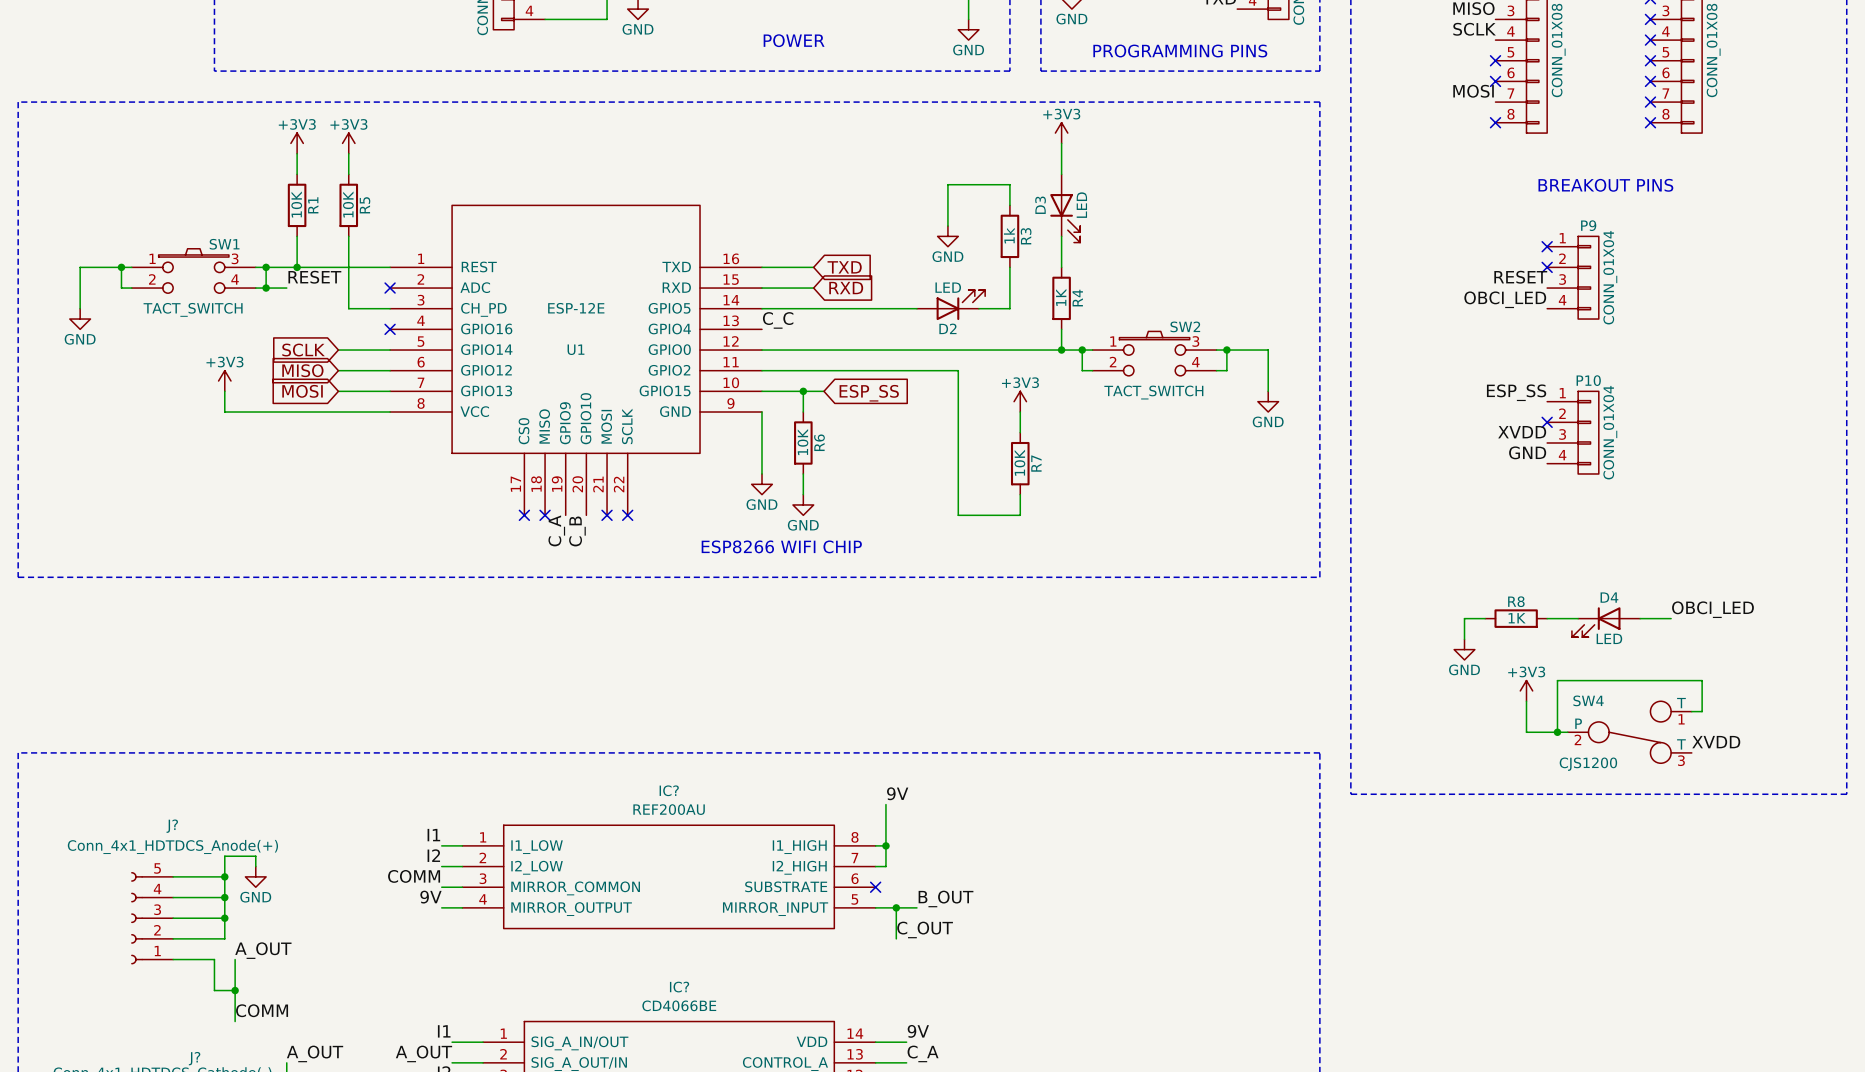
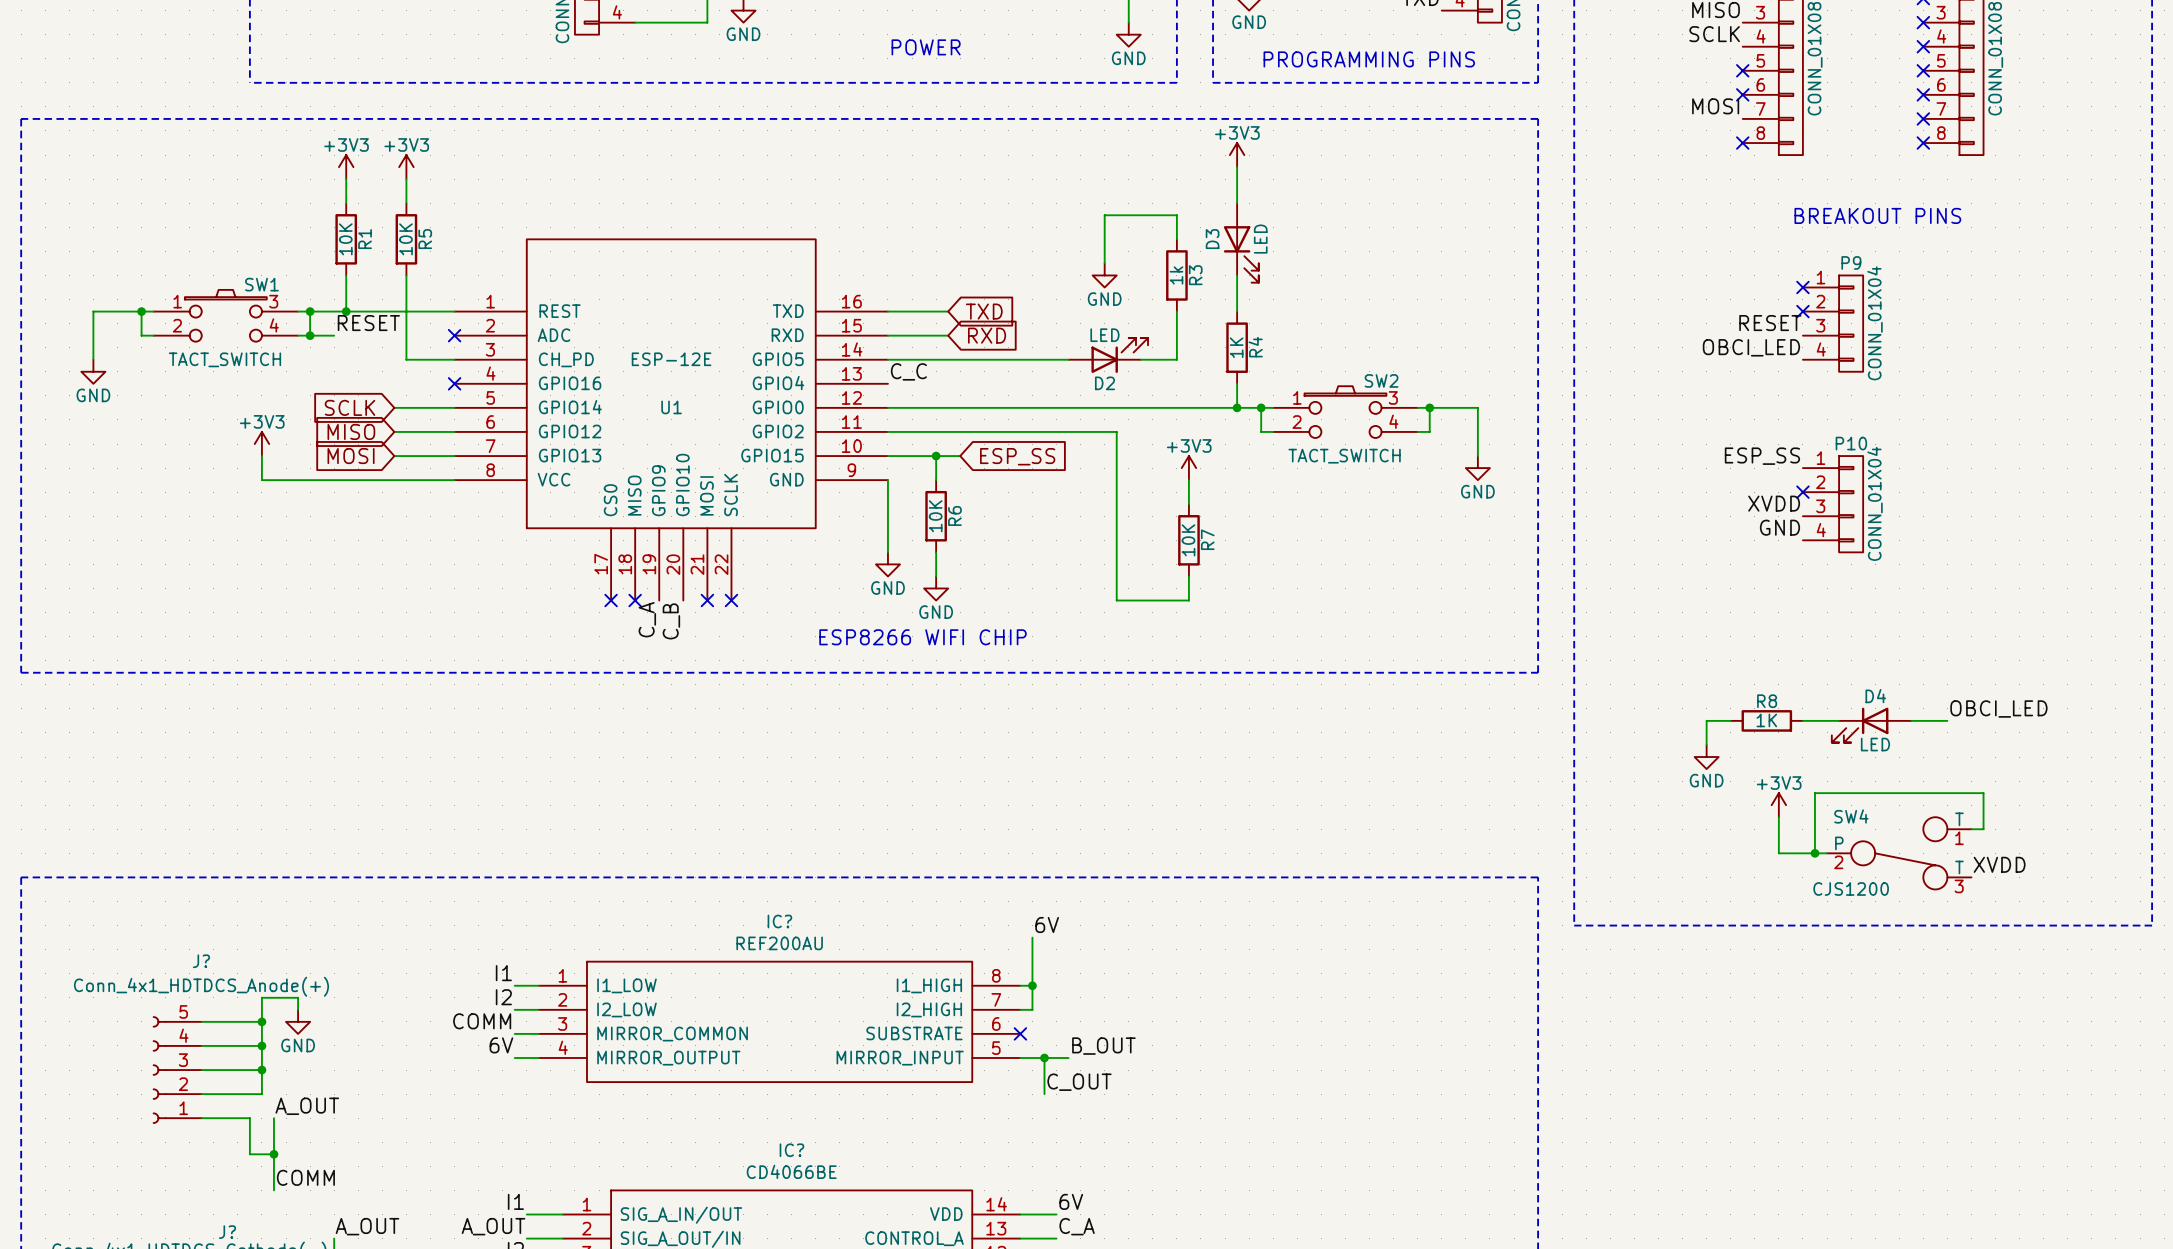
label: 9V (897, 793) -> 6V (1047, 925)
label: 9V (430, 897) -> 6V (501, 1045)
label: 9V (918, 1031) -> 6V (1071, 1201)

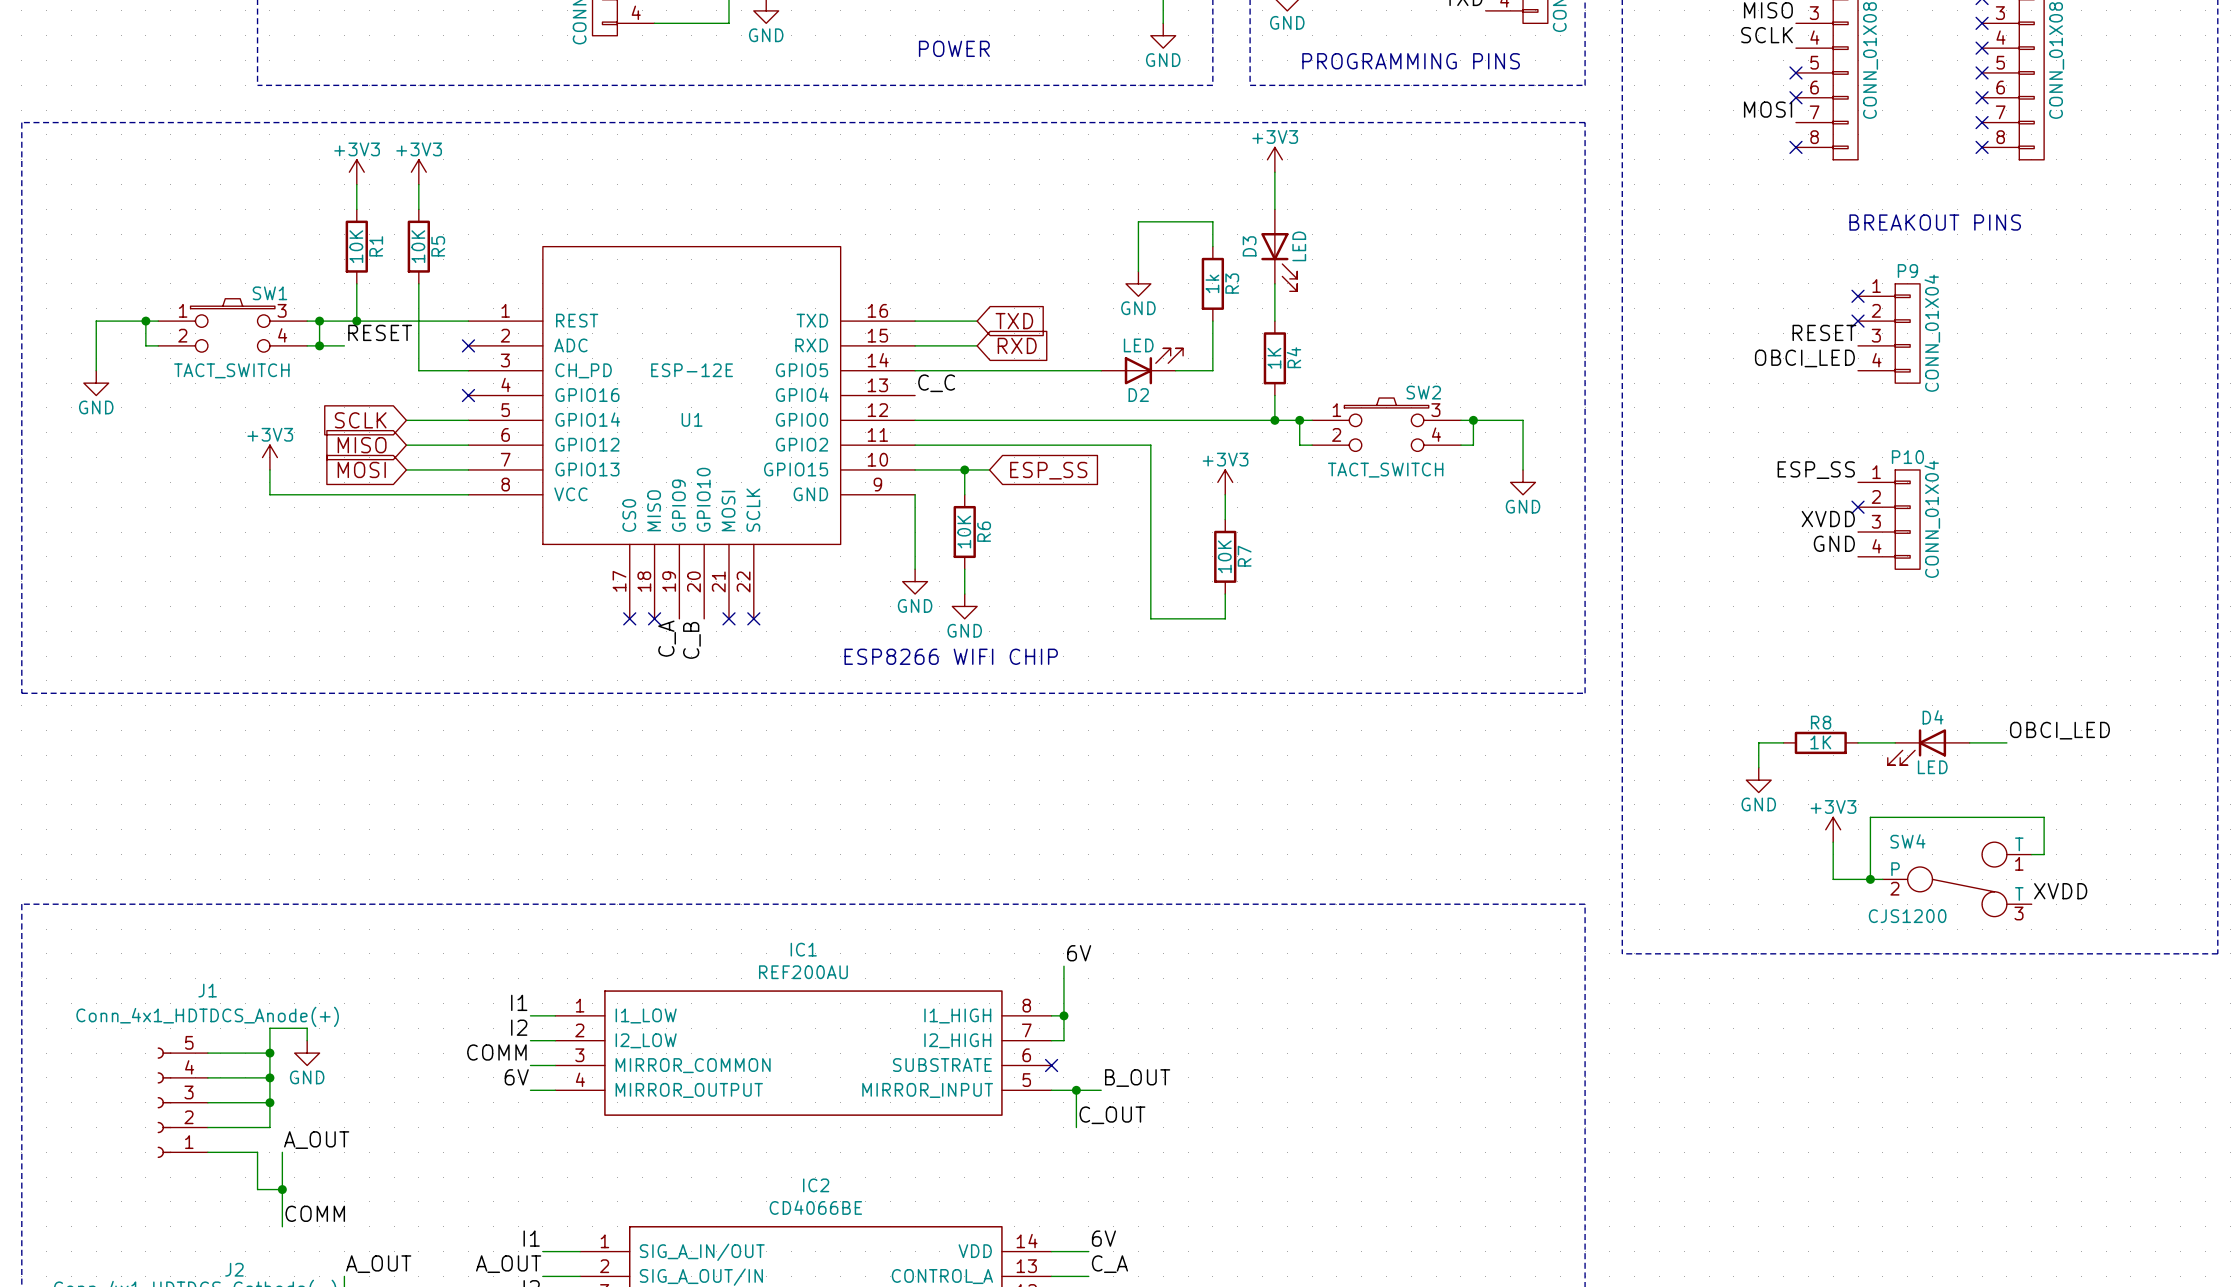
IC? name: IC? (779, 921) -> IC1 (803, 949)
J? name: J? (201, 961) -> J1 (207, 990)
IC? name: IC? (791, 1150) -> IC2 (816, 1185)
J? name: J? (227, 1232) -> J2 (234, 1269)

